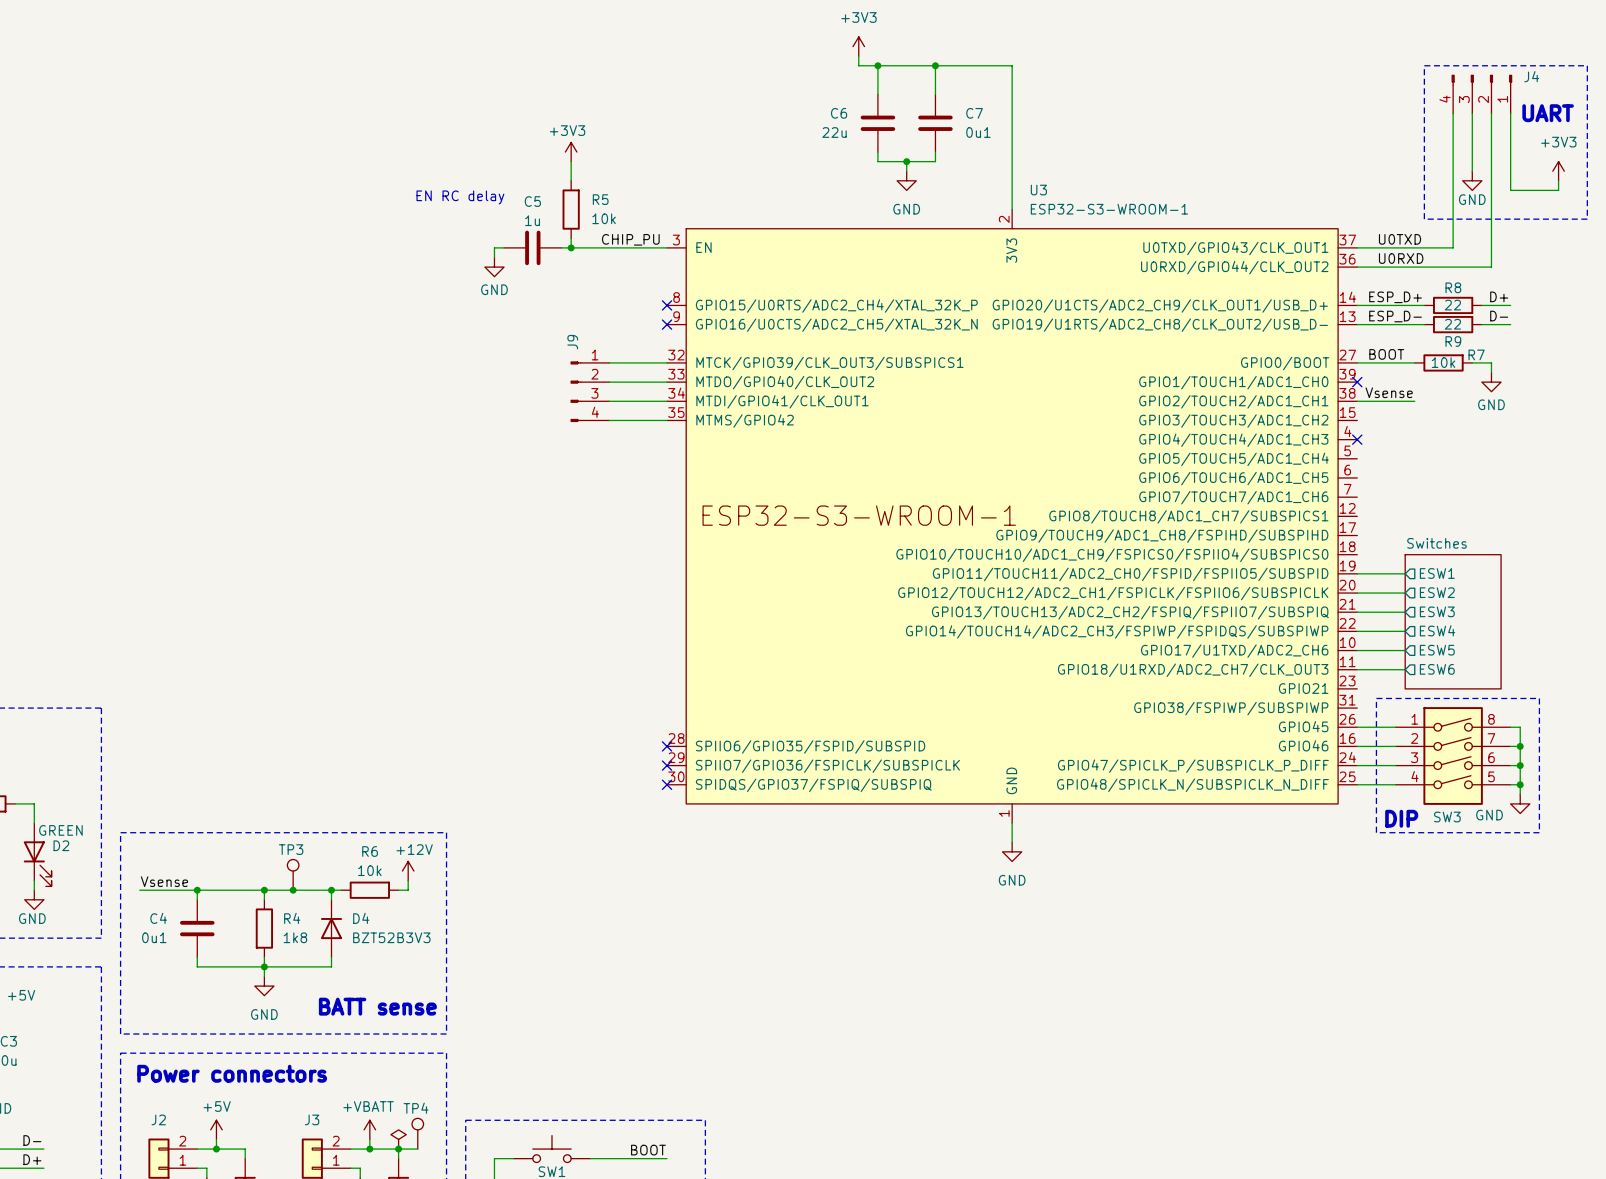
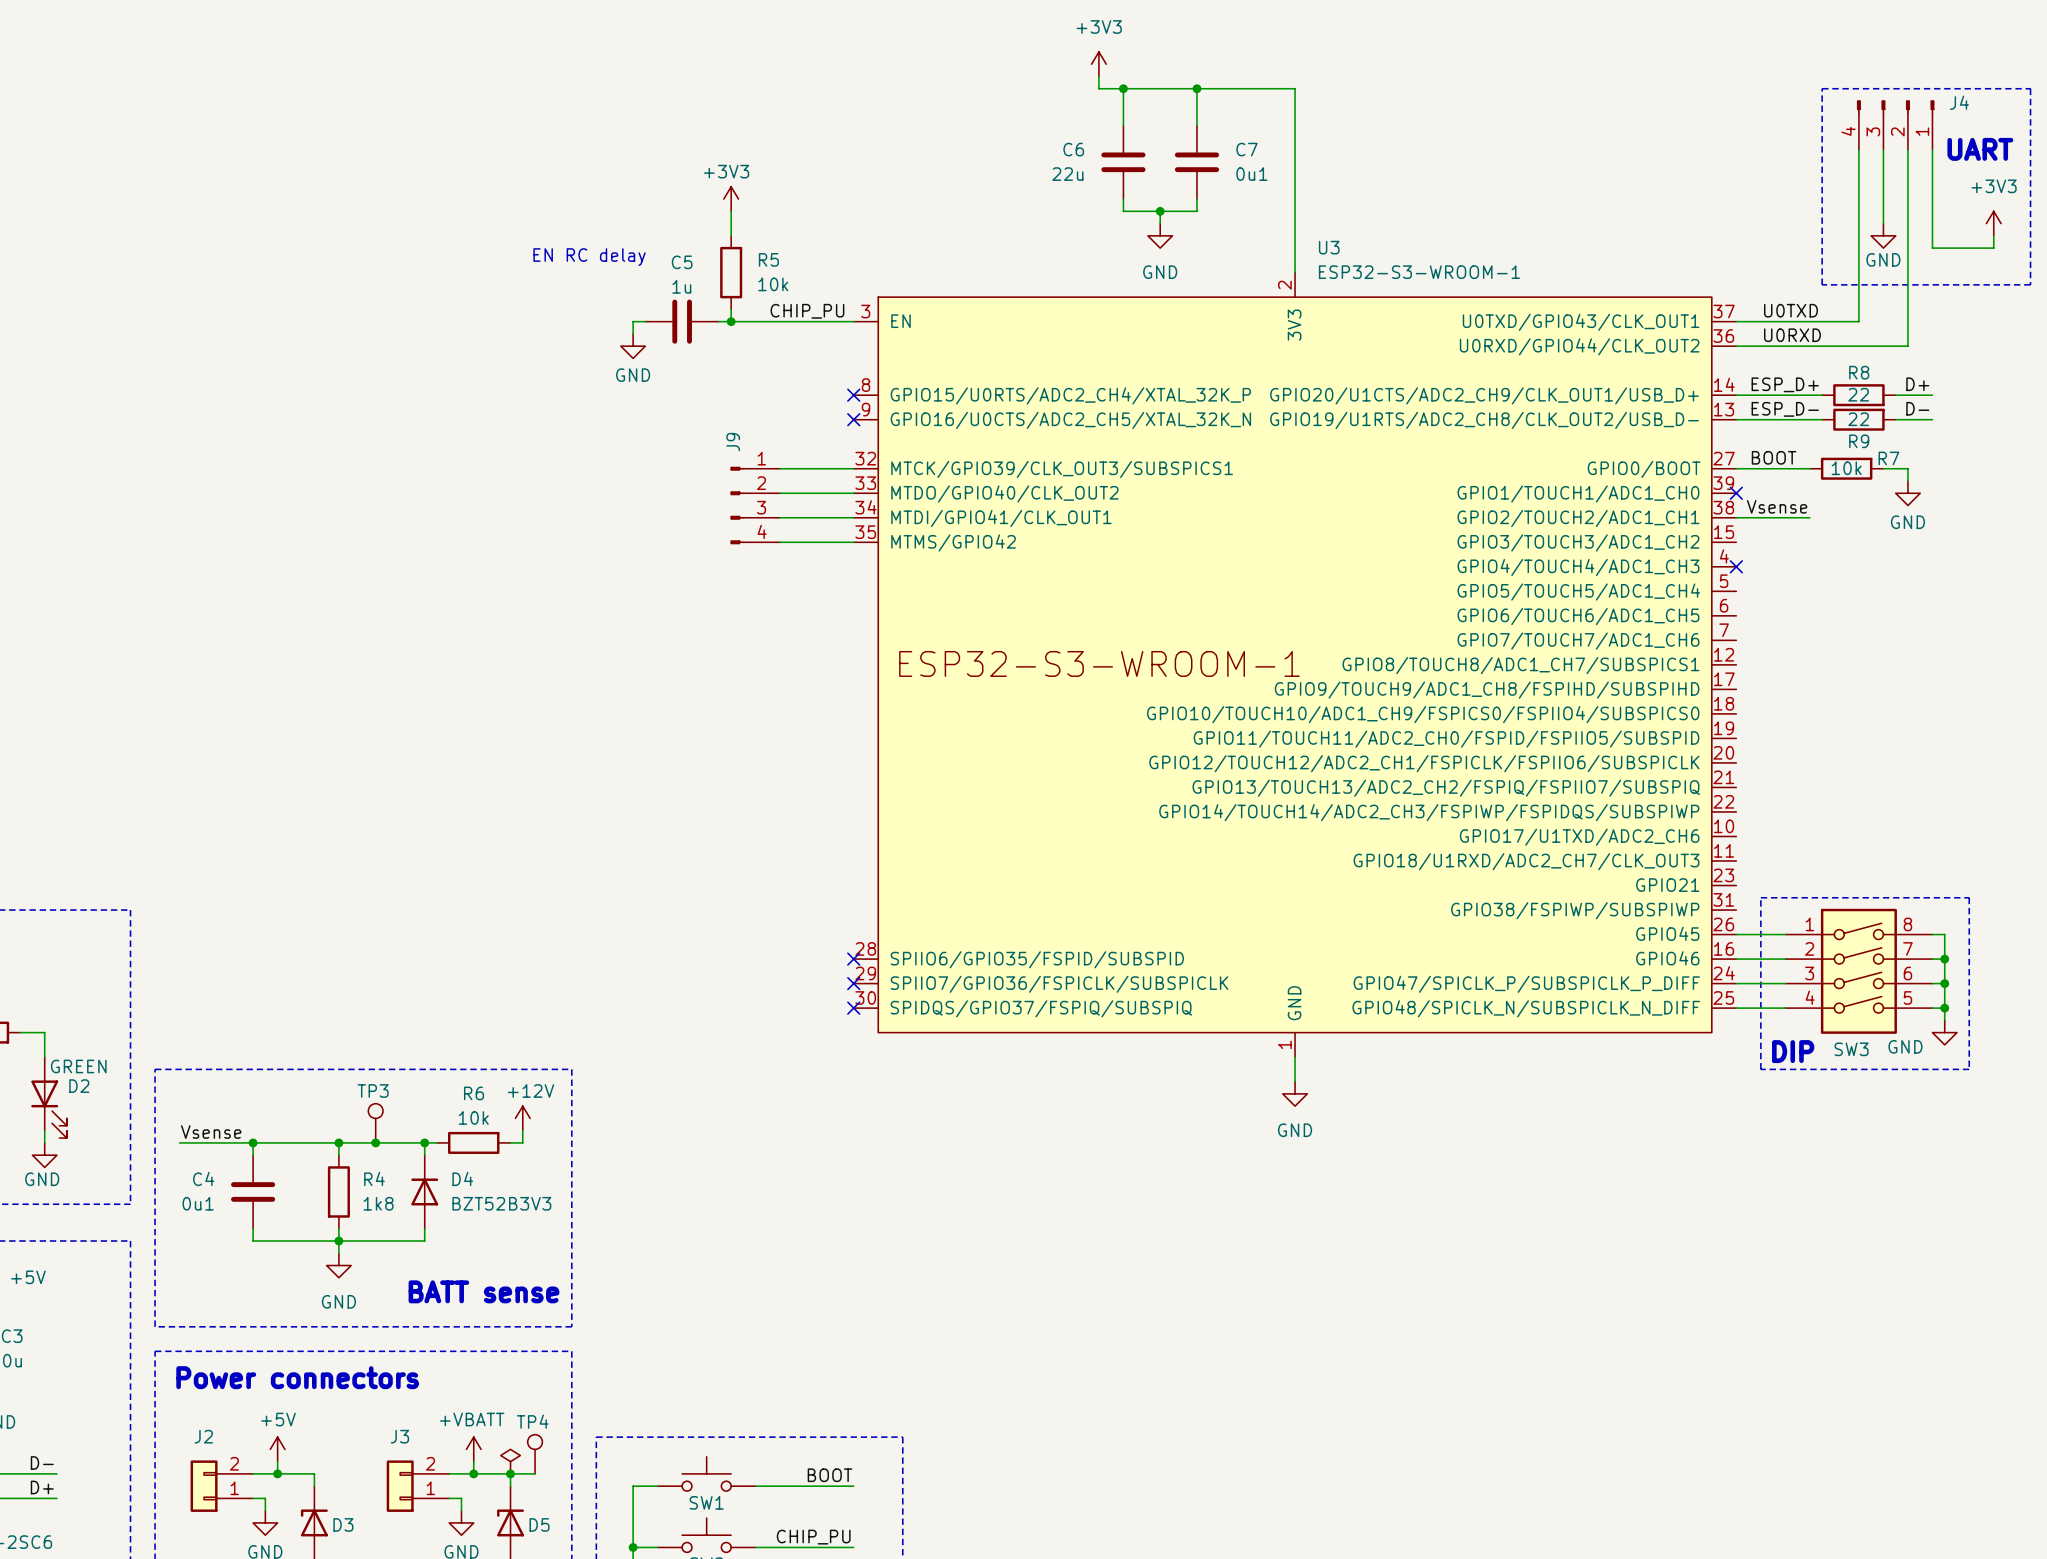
wire: (1357, 573) (1405, 573) -> none
sheet pin: ESW1 (1437, 573) -> none
sheet pin: ESW2 (1437, 592) -> none
wire: (1357, 593) (1405, 593) -> none
sheet pin: ESW3 (1437, 611) -> none
wire: (1357, 612) (1405, 612) -> none
sheet Switches: (1453, 621) -> none
sheet pin: ESW4 (1437, 630) -> none
wire: (1357, 631) (1405, 631) -> none
wire: (1357, 650) (1405, 650) -> none
sheet pin: ESW5 (1437, 650) -> none
wire: (1357, 669) (1405, 669) -> none
sheet pin: ESW6 (1437, 669) -> none

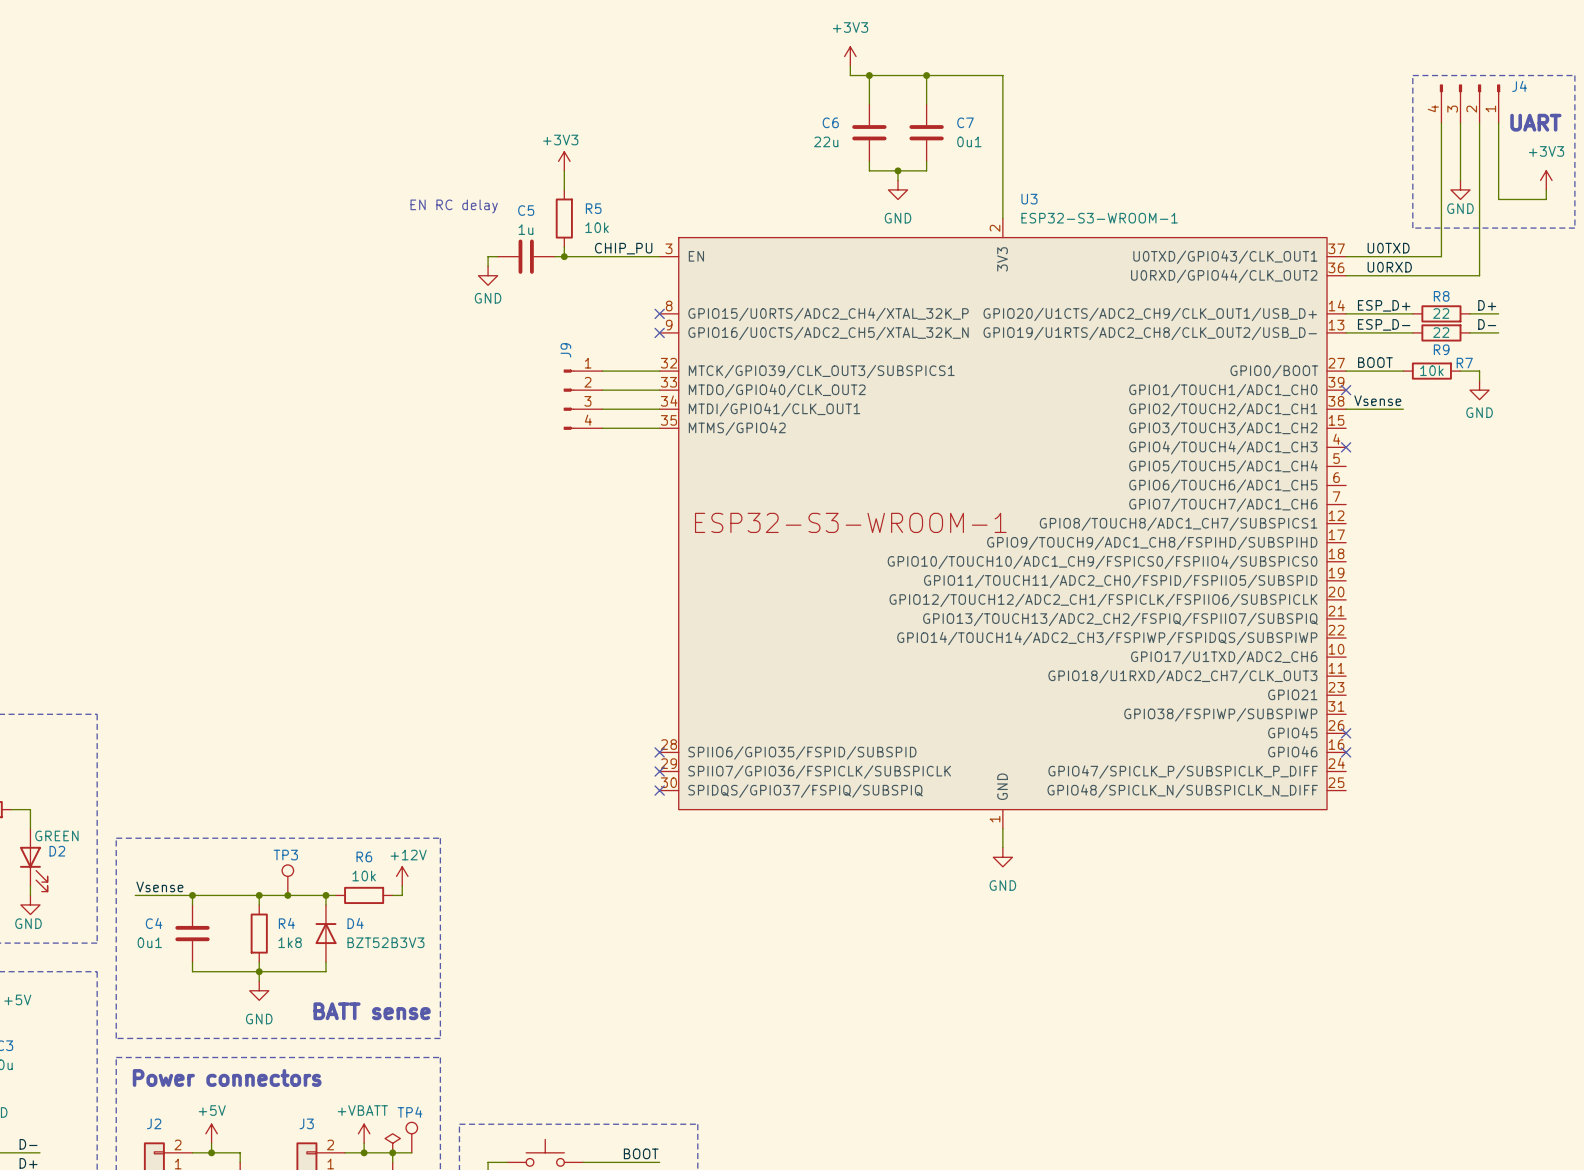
line: (1760, 897) (1969, 897) (1969, 1069) (1760, 1069) (1760, 897) -> none
wire: (1736, 934) (1785, 934) -> none
no-connect mark: none -> (1346, 733)
wire: (1932, 934) (1944, 934) (1944, 1020) -> none
wire: (1736, 959) (1785, 959) -> none
no-connect mark: none -> (1346, 752)
wire: (1932, 959) (1944, 959) -> none
junction: (1944, 959) -> none
SW3: (1858, 971) -> none
wire: (1736, 983) (1785, 983) -> none
wire: (1932, 983) (1944, 983) -> none
junction: (1944, 983) -> none
wire: (1736, 1008) (1785, 1008) -> none
wire: (1932, 1008) (1944, 1008) -> none
junction: (1944, 1008) -> none
power symbol: GND (1944, 1032) -> none
text: DIP (1793, 1051) -> none

